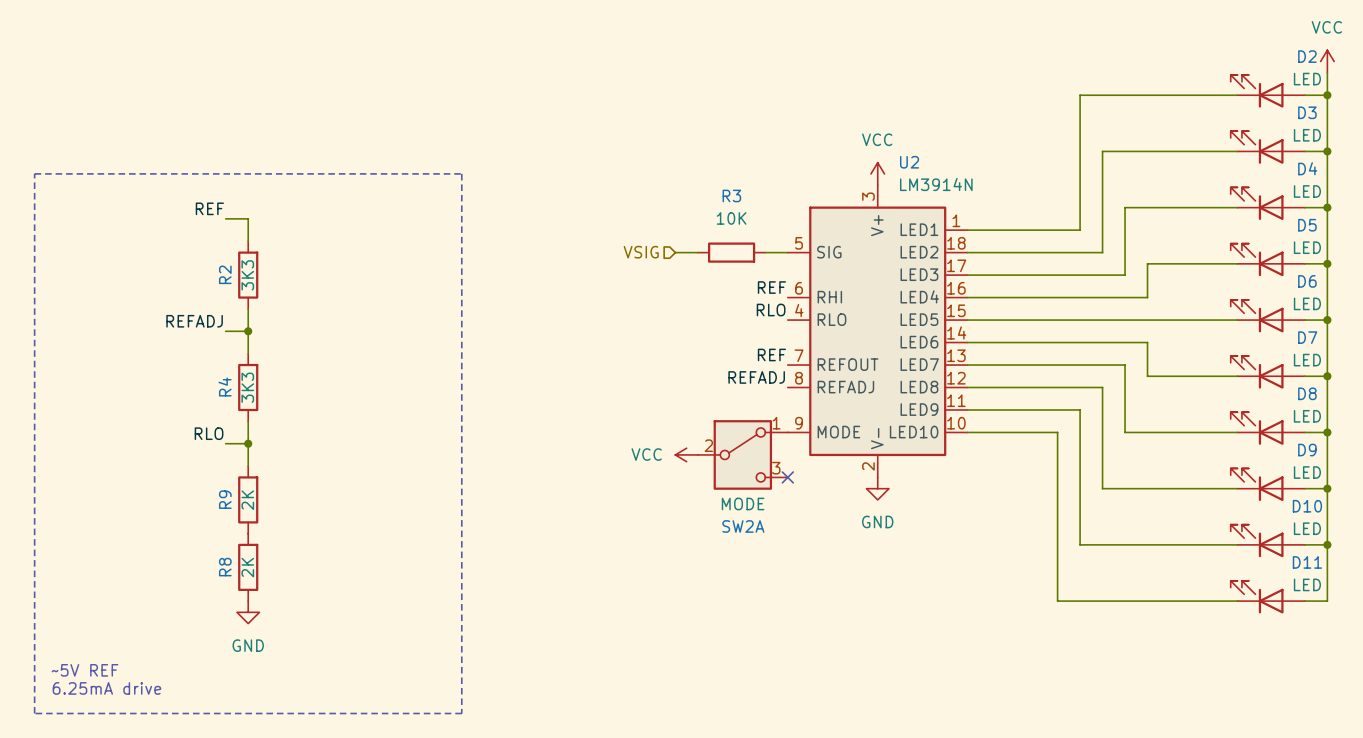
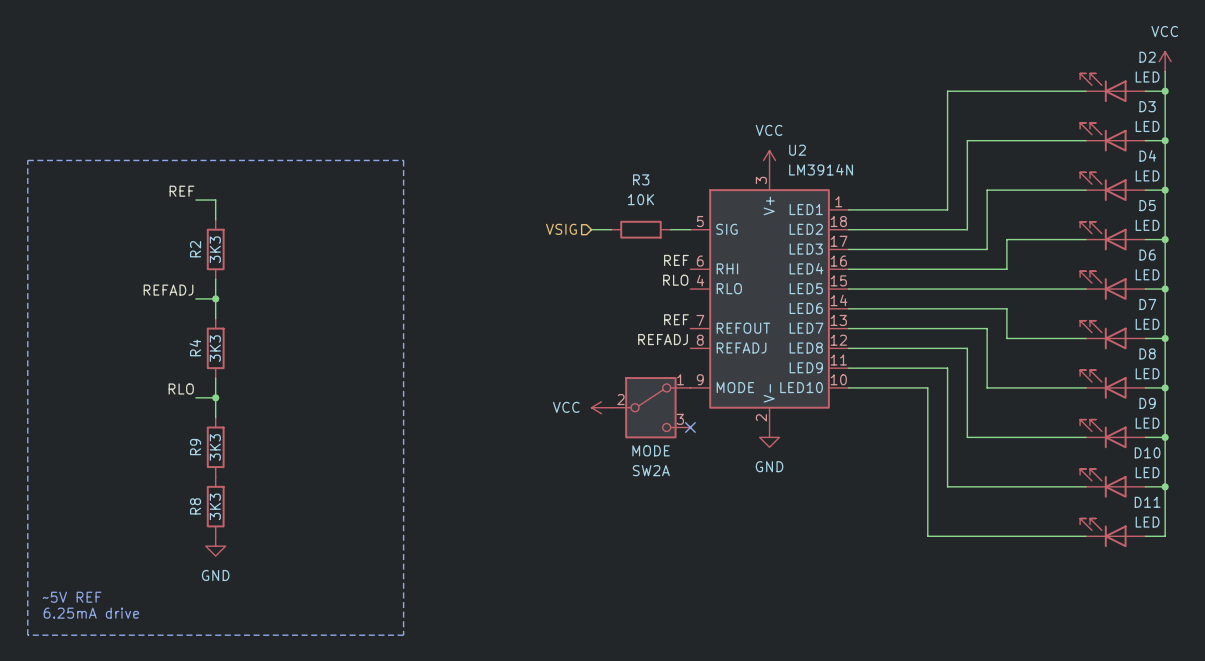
R9 value: 2K (247, 500) -> 3K3 (215, 447)
R8 value: 2K (247, 567) -> 3K3 (215, 506)

